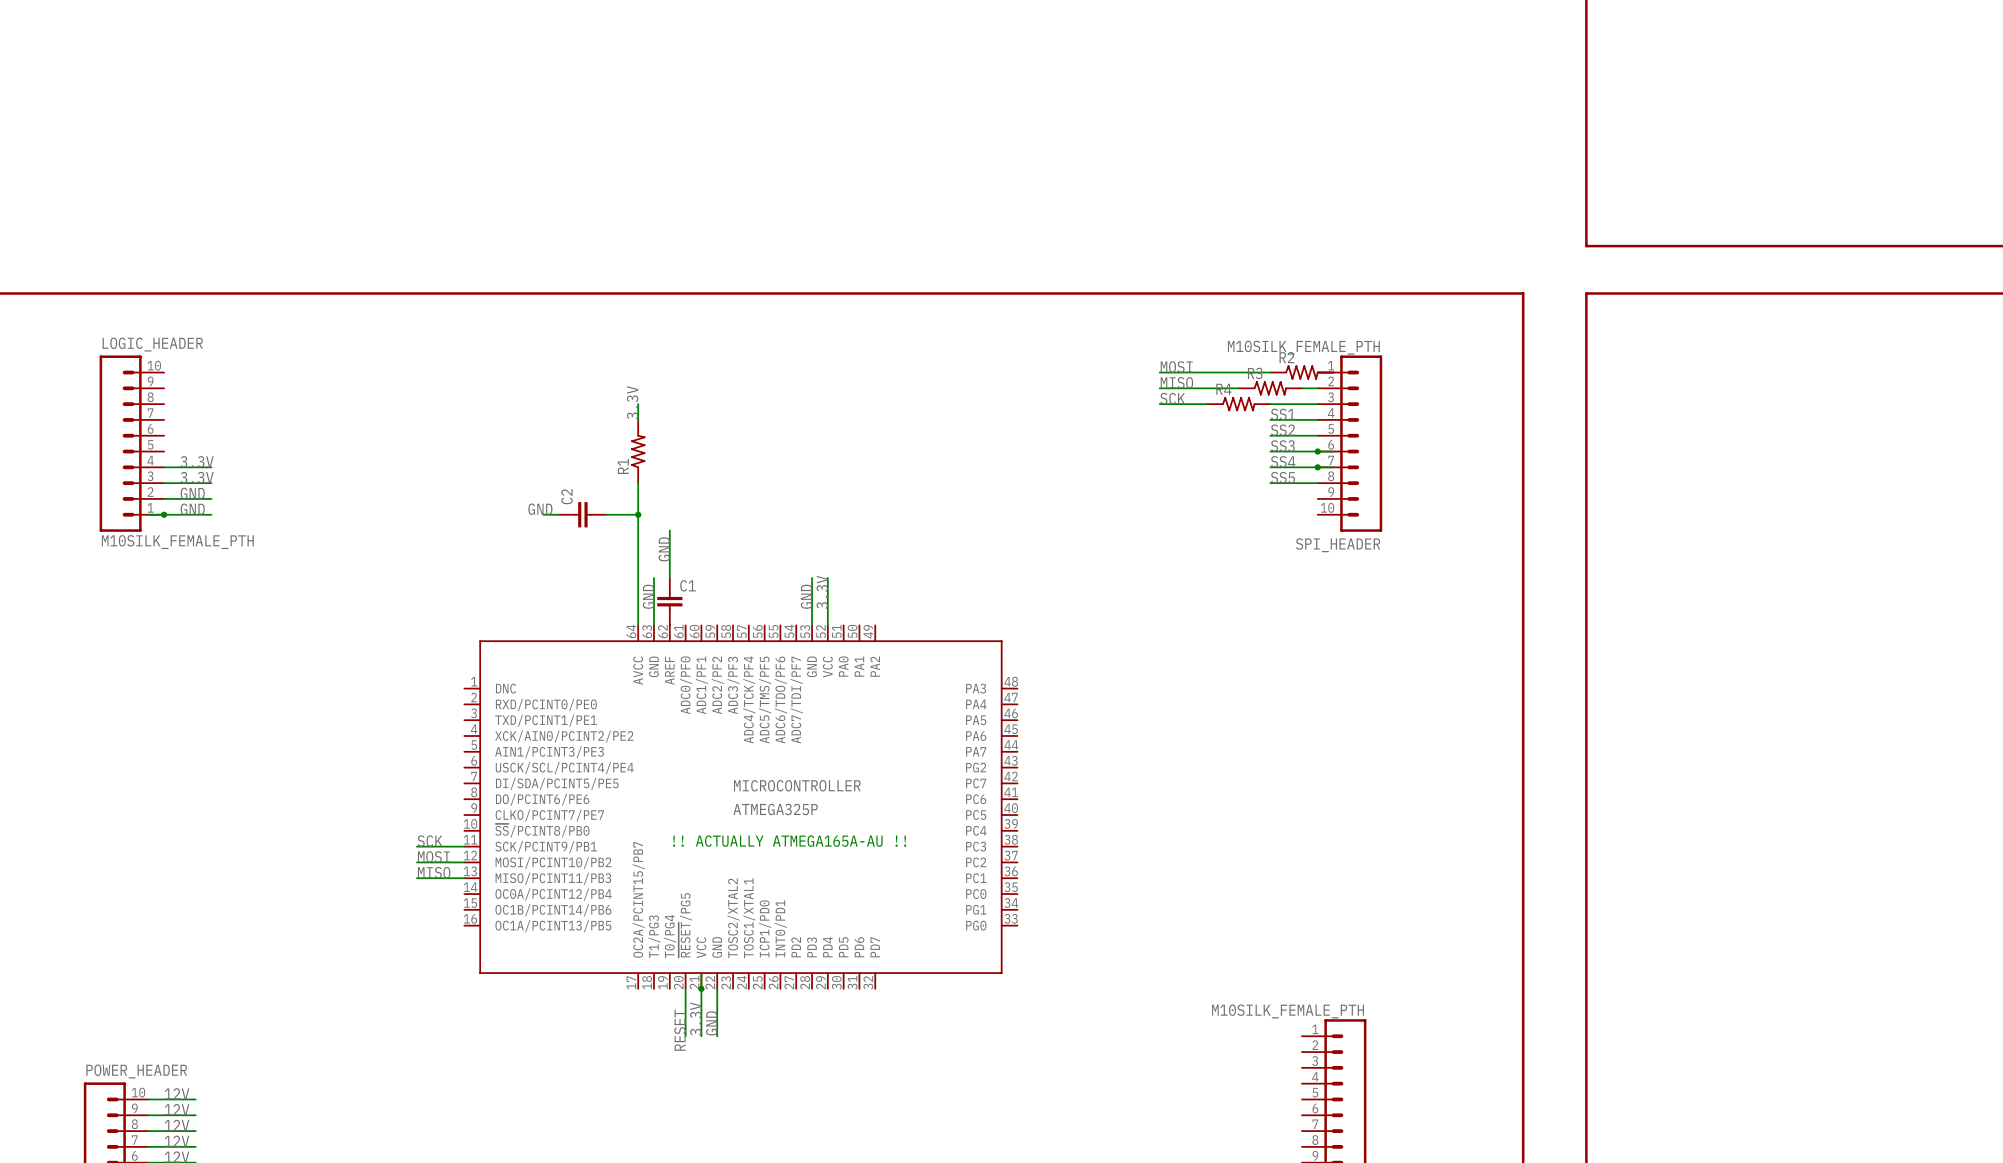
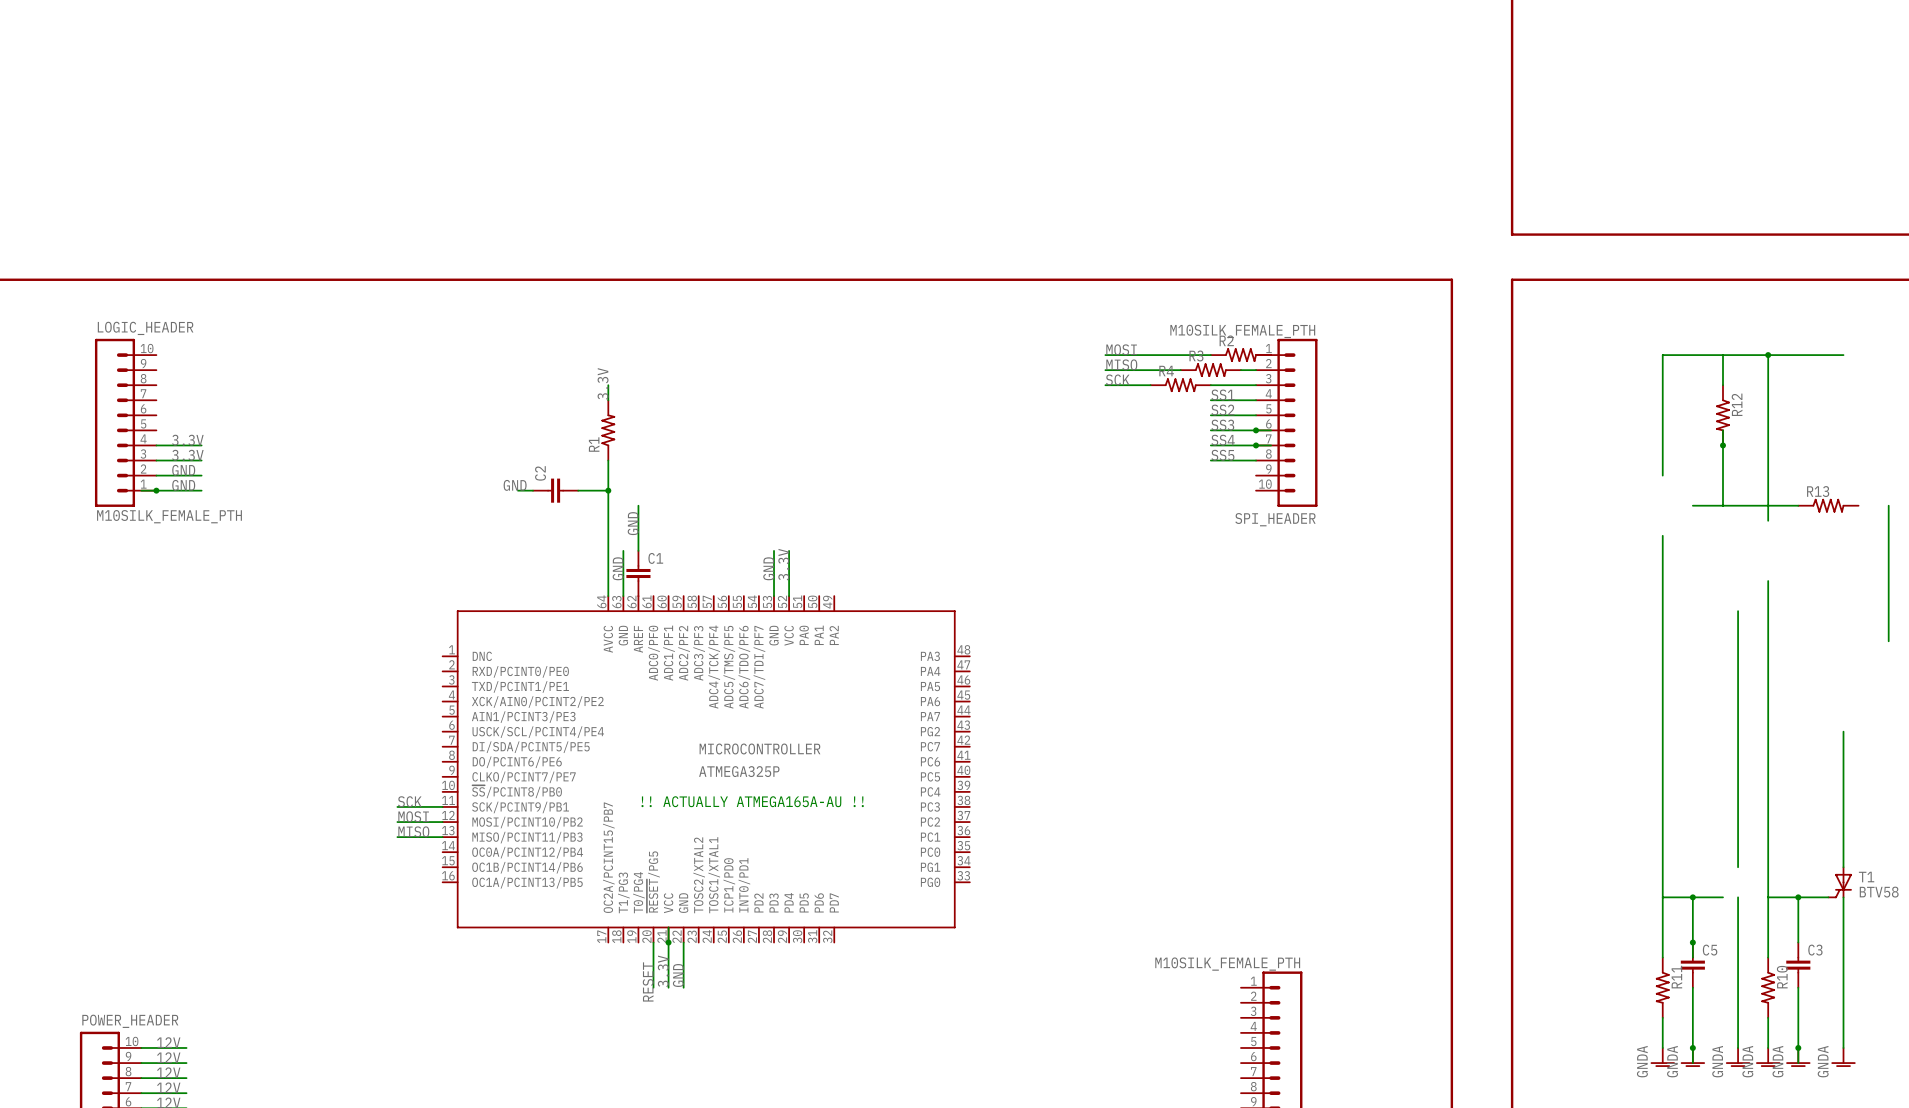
wire: none -> (1722, 355) (1722, 385)
wire: none -> (1768, 355) (1768, 520)
junction: none -> (1768, 355)
wire: none -> (1843, 355) (1662, 355) (1662, 475)
R12: none -> (1722, 415)
wire: none -> (1722, 430) (1722, 505)
junction: none -> (1722, 445)
wire: none -> (1692, 505) (1798, 505)
R13: none -> (1828, 505)
wire: none -> (1888, 505) (1888, 641)
wire: none -> (1662, 535) (1662, 957)
wire: none -> (1768, 581) (1768, 957)
wire: none -> (1738, 611) (1738, 867)
wire: none -> (1843, 731) (1843, 867)
T1: none -> BTV58 (1839, 882)
wire: none -> (1662, 897) (1722, 897)
wire: none -> (1692, 897) (1692, 957)
junction: none -> (1692, 897)
wire: none -> (1738, 897) (1738, 1047)
wire: none -> (1768, 897) (1828, 897)
wire: none -> (1798, 897) (1798, 942)
junction: none -> (1798, 897)
wire: none -> (1843, 897) (1843, 1047)
junction: none -> (1692, 942)
C5: none -> (1692, 965)
C3: none -> (1798, 965)
R11: none -> (1662, 987)
wire: none -> (1692, 987) (1692, 1063)
R10: none -> (1768, 987)
wire: none -> (1798, 987) (1798, 1063)
wire: none -> (1662, 1017) (1662, 1047)
wire: none -> (1768, 1017) (1768, 1047)
junction: none -> (1692, 1047)
junction: none -> (1798, 1047)
power symbol: none -> GNDA (1662, 1057)
power symbol: none -> GNDA (1692, 1057)
power symbol: none -> GNDA (1738, 1057)
power symbol: none -> GNDA (1768, 1057)
power symbol: none -> GNDA (1798, 1057)
power symbol: none -> GNDA (1843, 1057)

